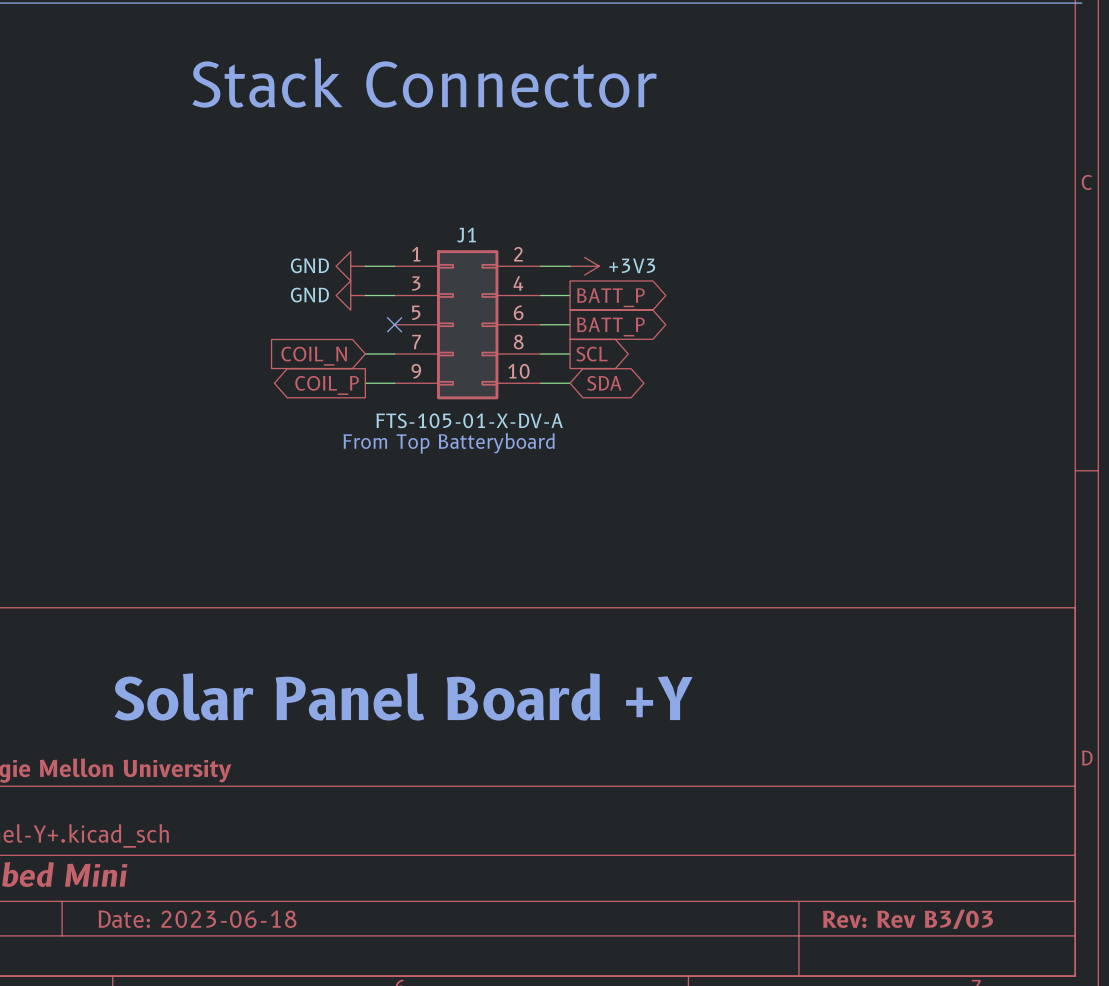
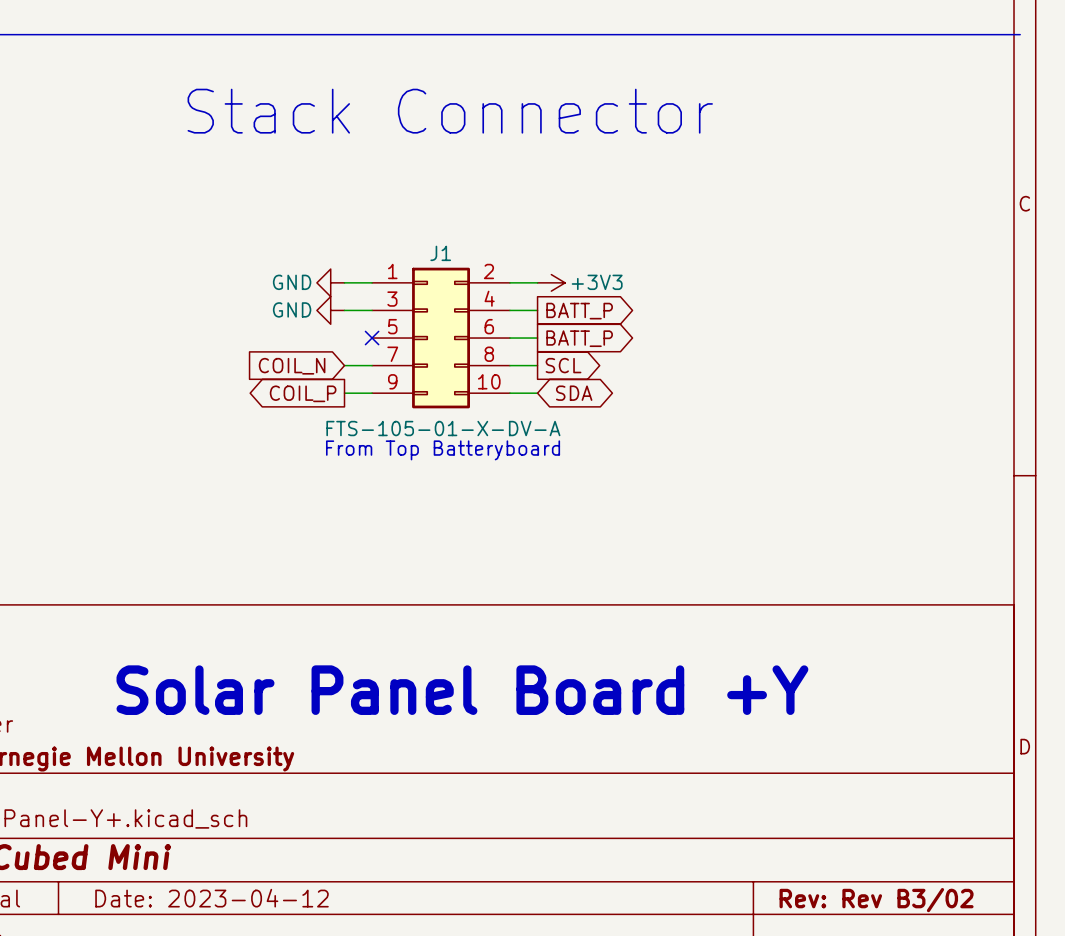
title block: Date: 2023-06-18 (197, 919) -> Date: 2023-04-12 (211, 898)
title block: Rev: Rev B3/03 (907, 919) -> Rev: Rev B3/02 (876, 900)

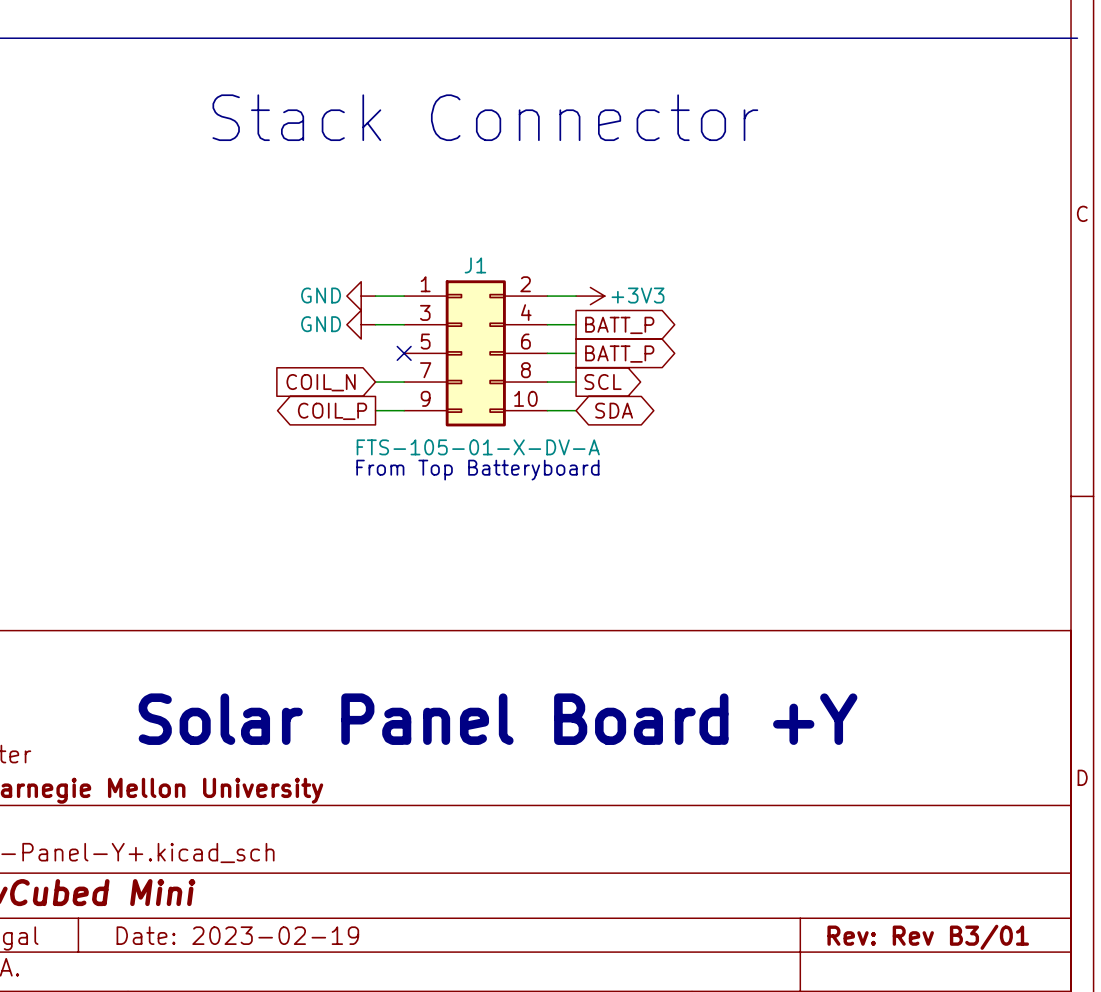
title block: Date: 2023-04-12 (211, 898) -> Date: 2023-02-19 (237, 935)
title block: Rev: Rev B3/02 (876, 900) -> Rev: Rev B3/01 (928, 937)

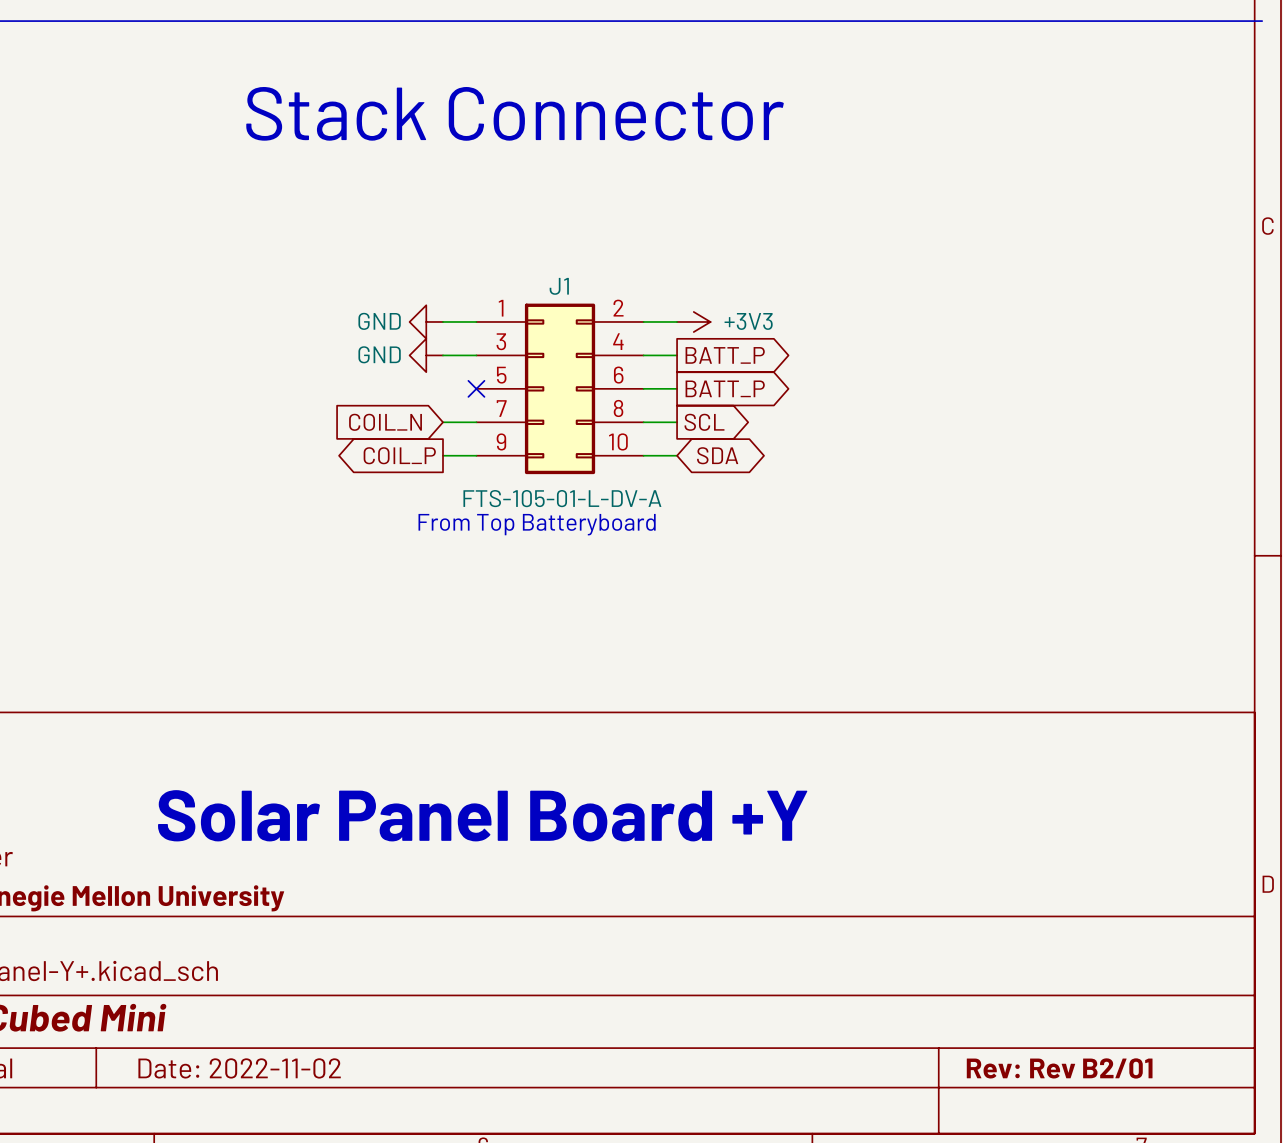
J1 value: FTS-105-01-X-DV-A (478, 447) -> FTS-105-01-L-DV-A (562, 498)
title block: Date: 2023-02-19 (237, 935) -> Date: 2022-11-02 (239, 1068)
title block: Rev: Rev B3/01 (928, 937) -> Rev: Rev B2/01 (1059, 1068)

